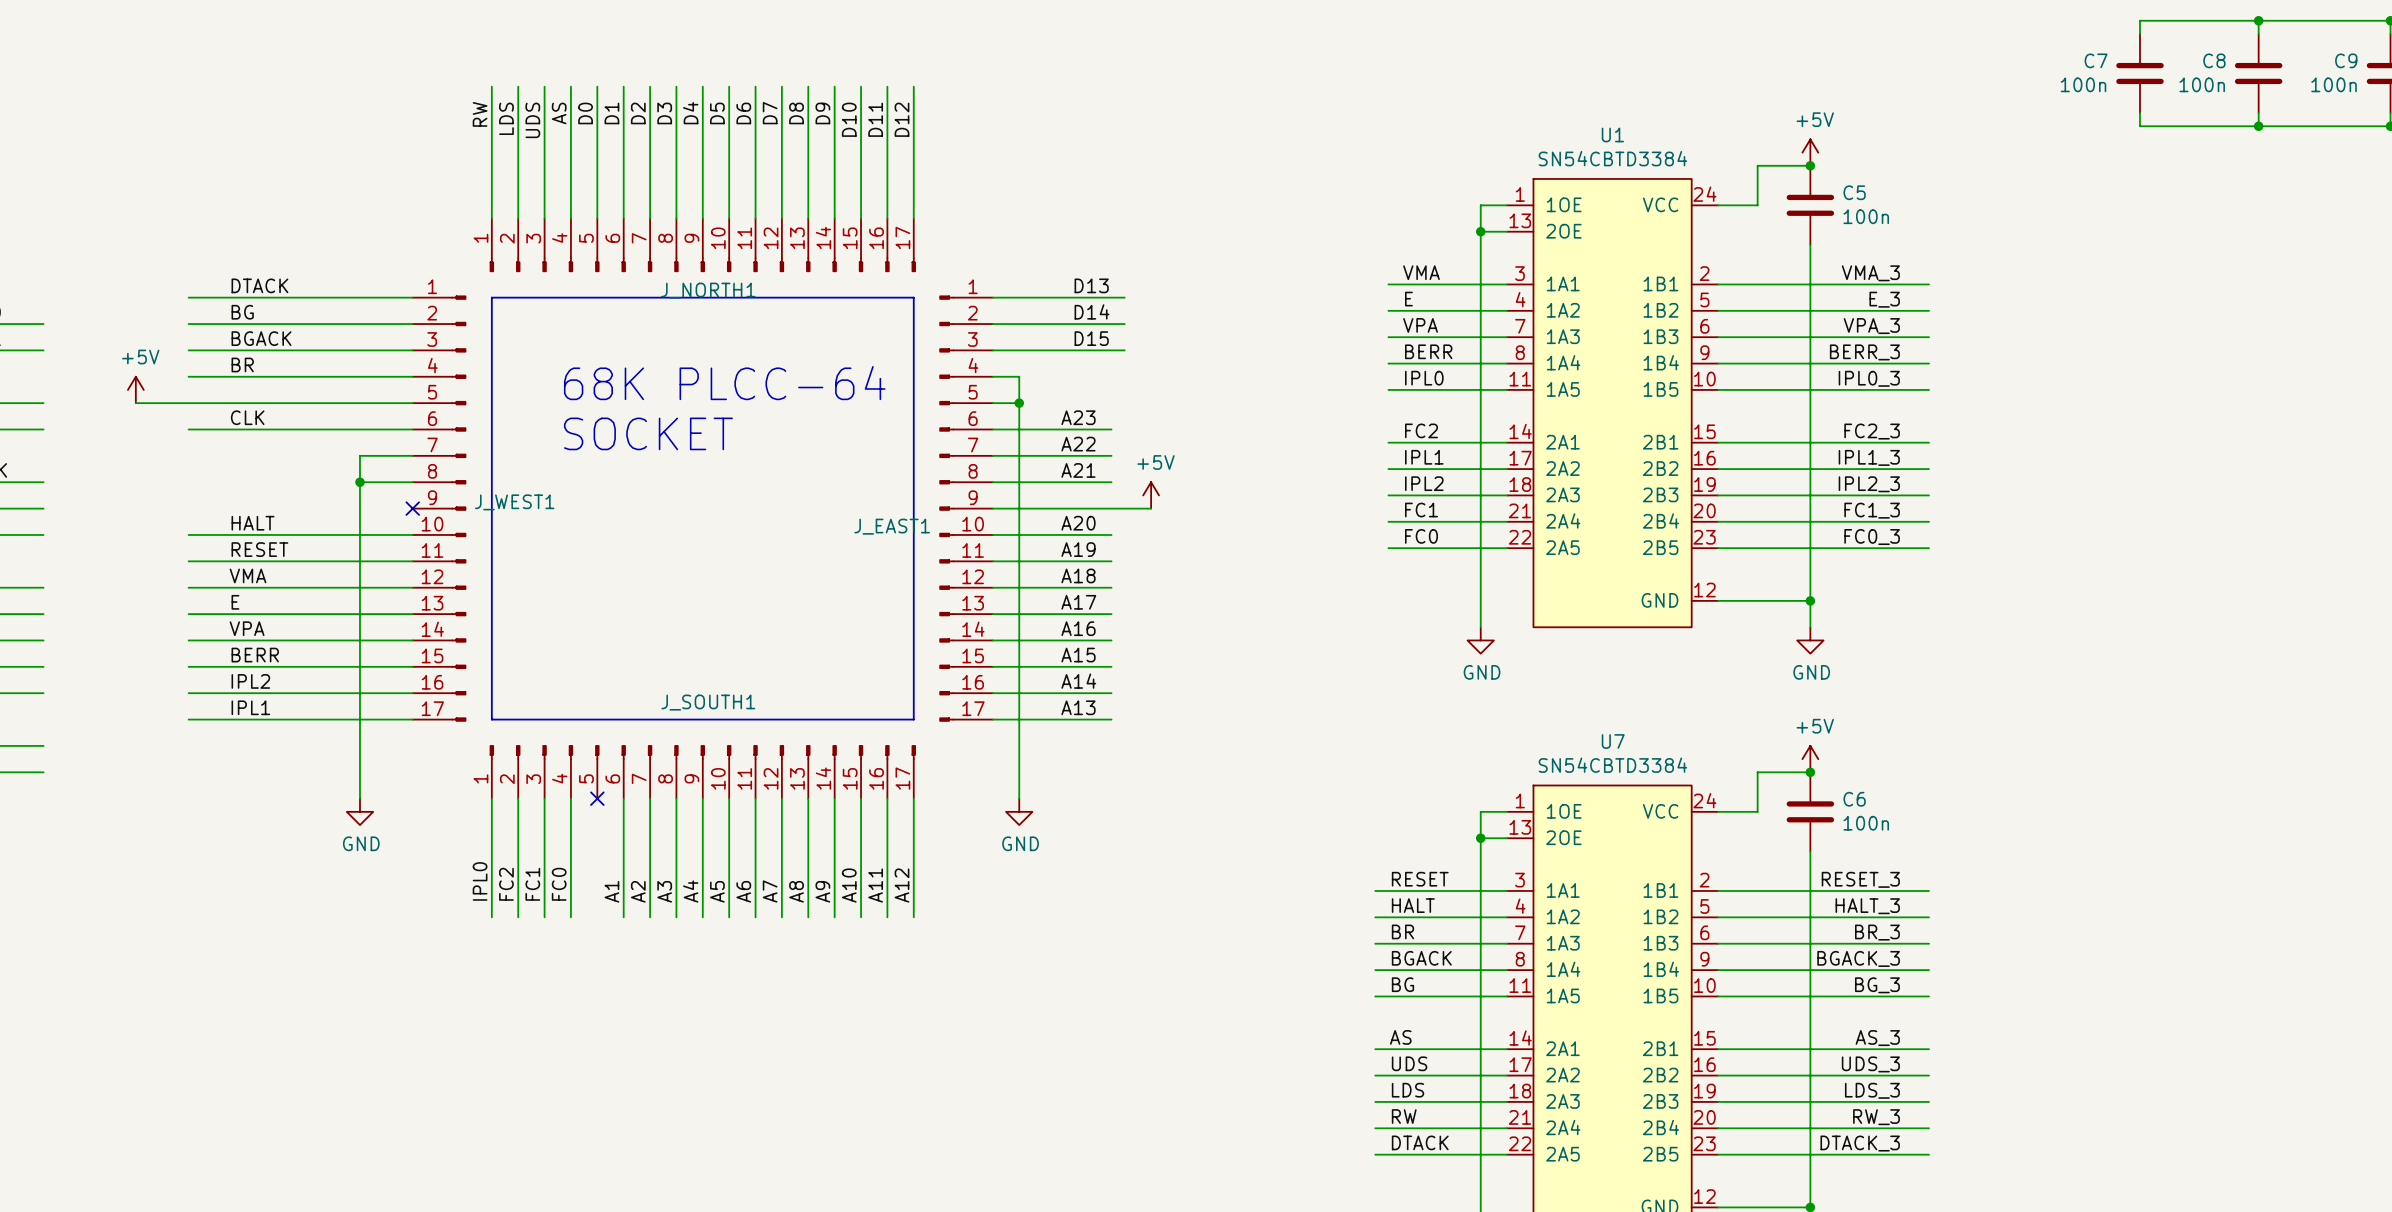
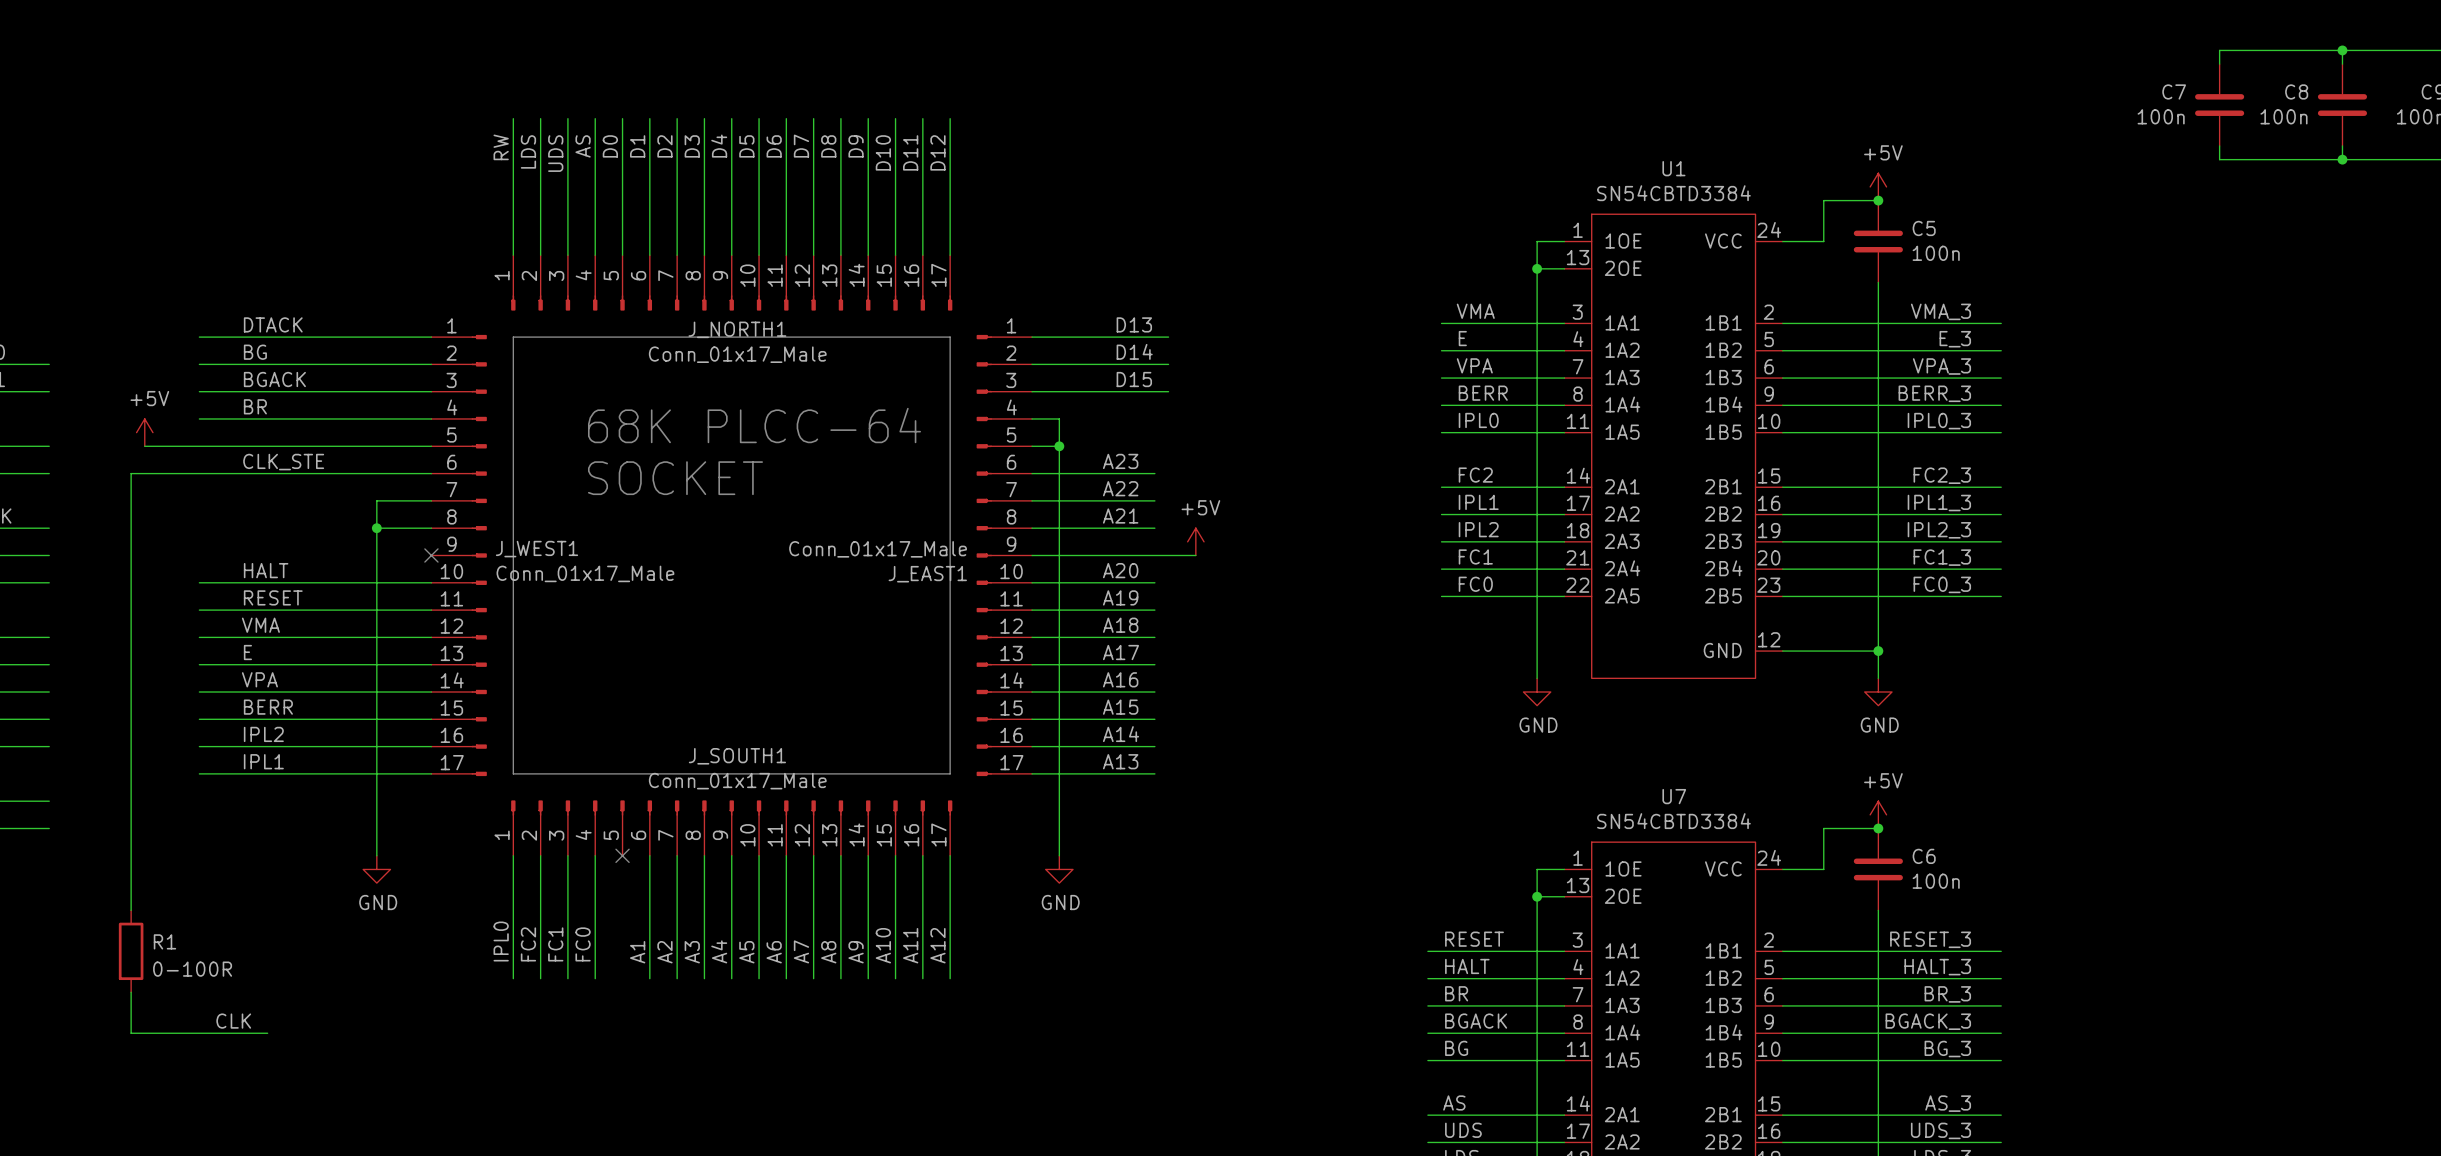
J_NORTH1 value: none -> Conn_01x17_Male (737, 354)
label: CLK (247, 417) -> CLK_STE (283, 462)
wire: none -> (199, 473) (131, 473) (131, 910)
J_EAST1 value: none -> Conn_01x17_Male (878, 549)
J_WEST1 value: none -> Conn_01x17_Male (585, 573)
J_SOUTH1 value: none -> Conn_01x17_Male (737, 781)
R1: none -> 0-100R (131, 951)
wire: none -> (131, 992) (131, 1033) (267, 1033)
label: none -> CLK (233, 1021)

